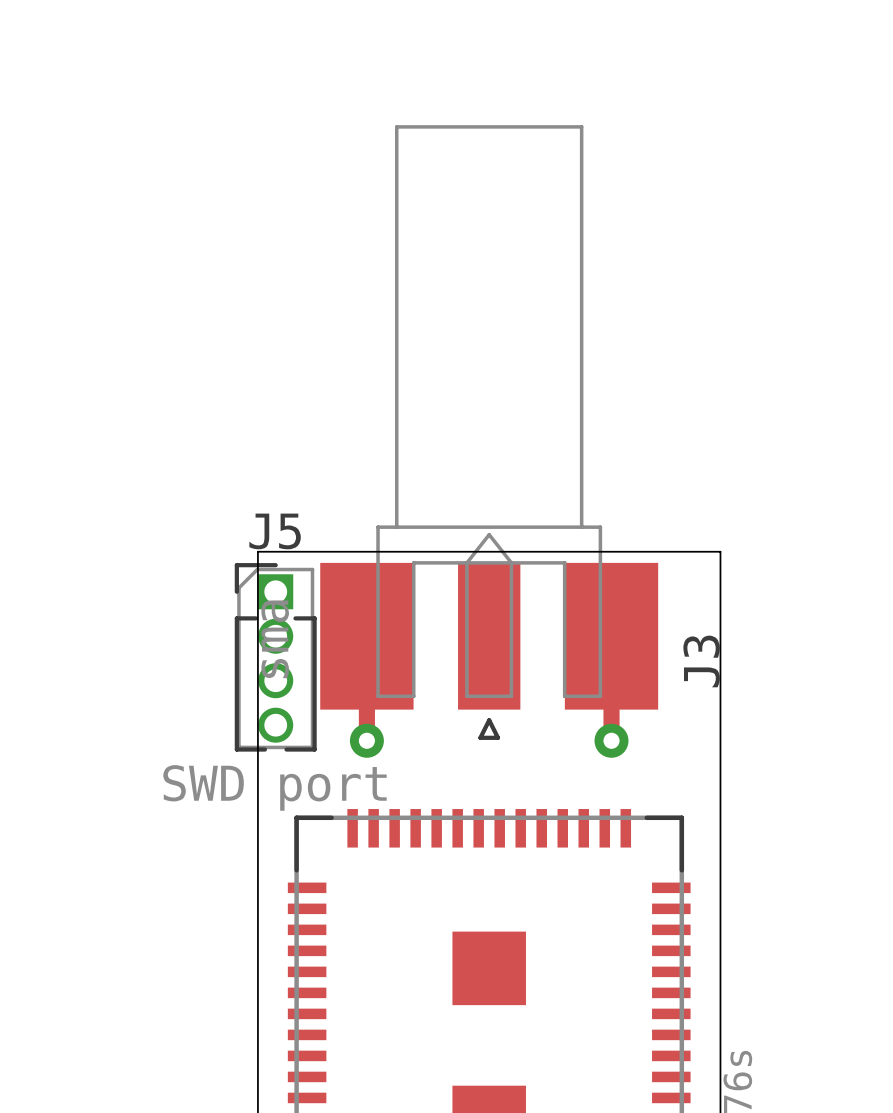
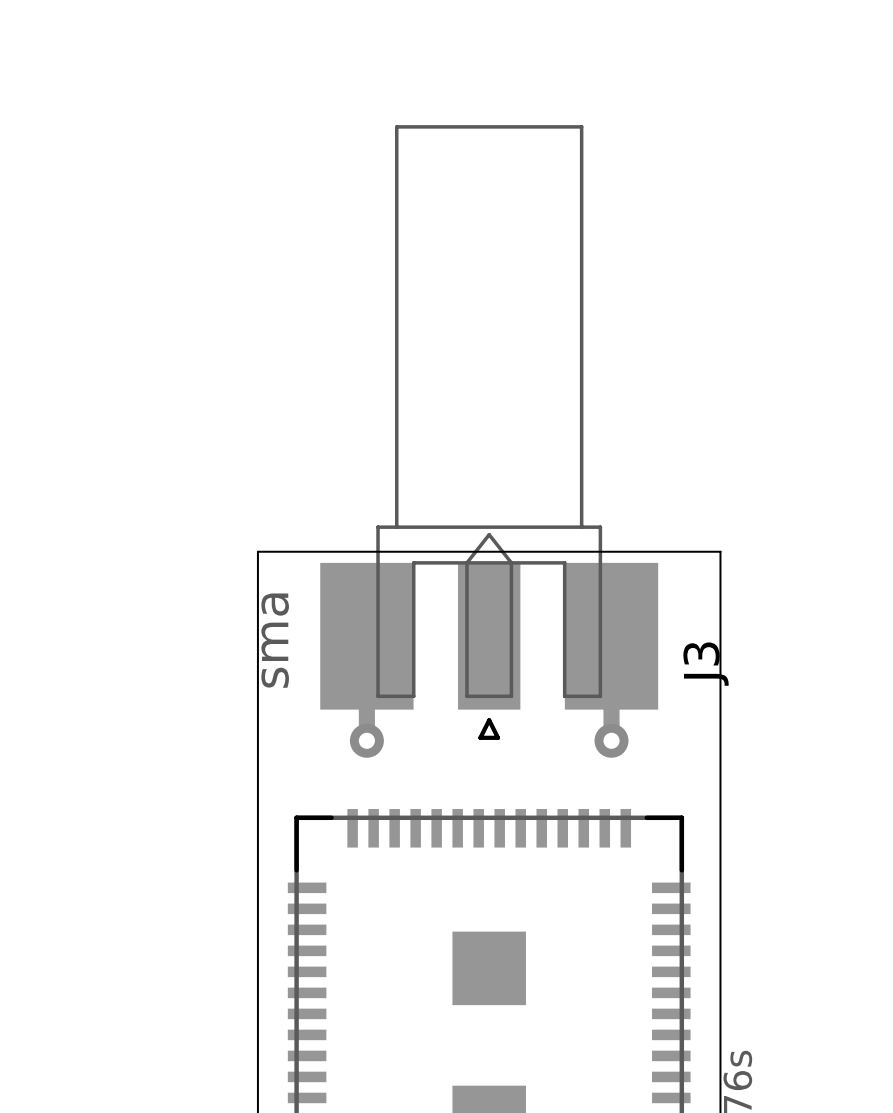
J5: SWD port (275, 657) -> none

